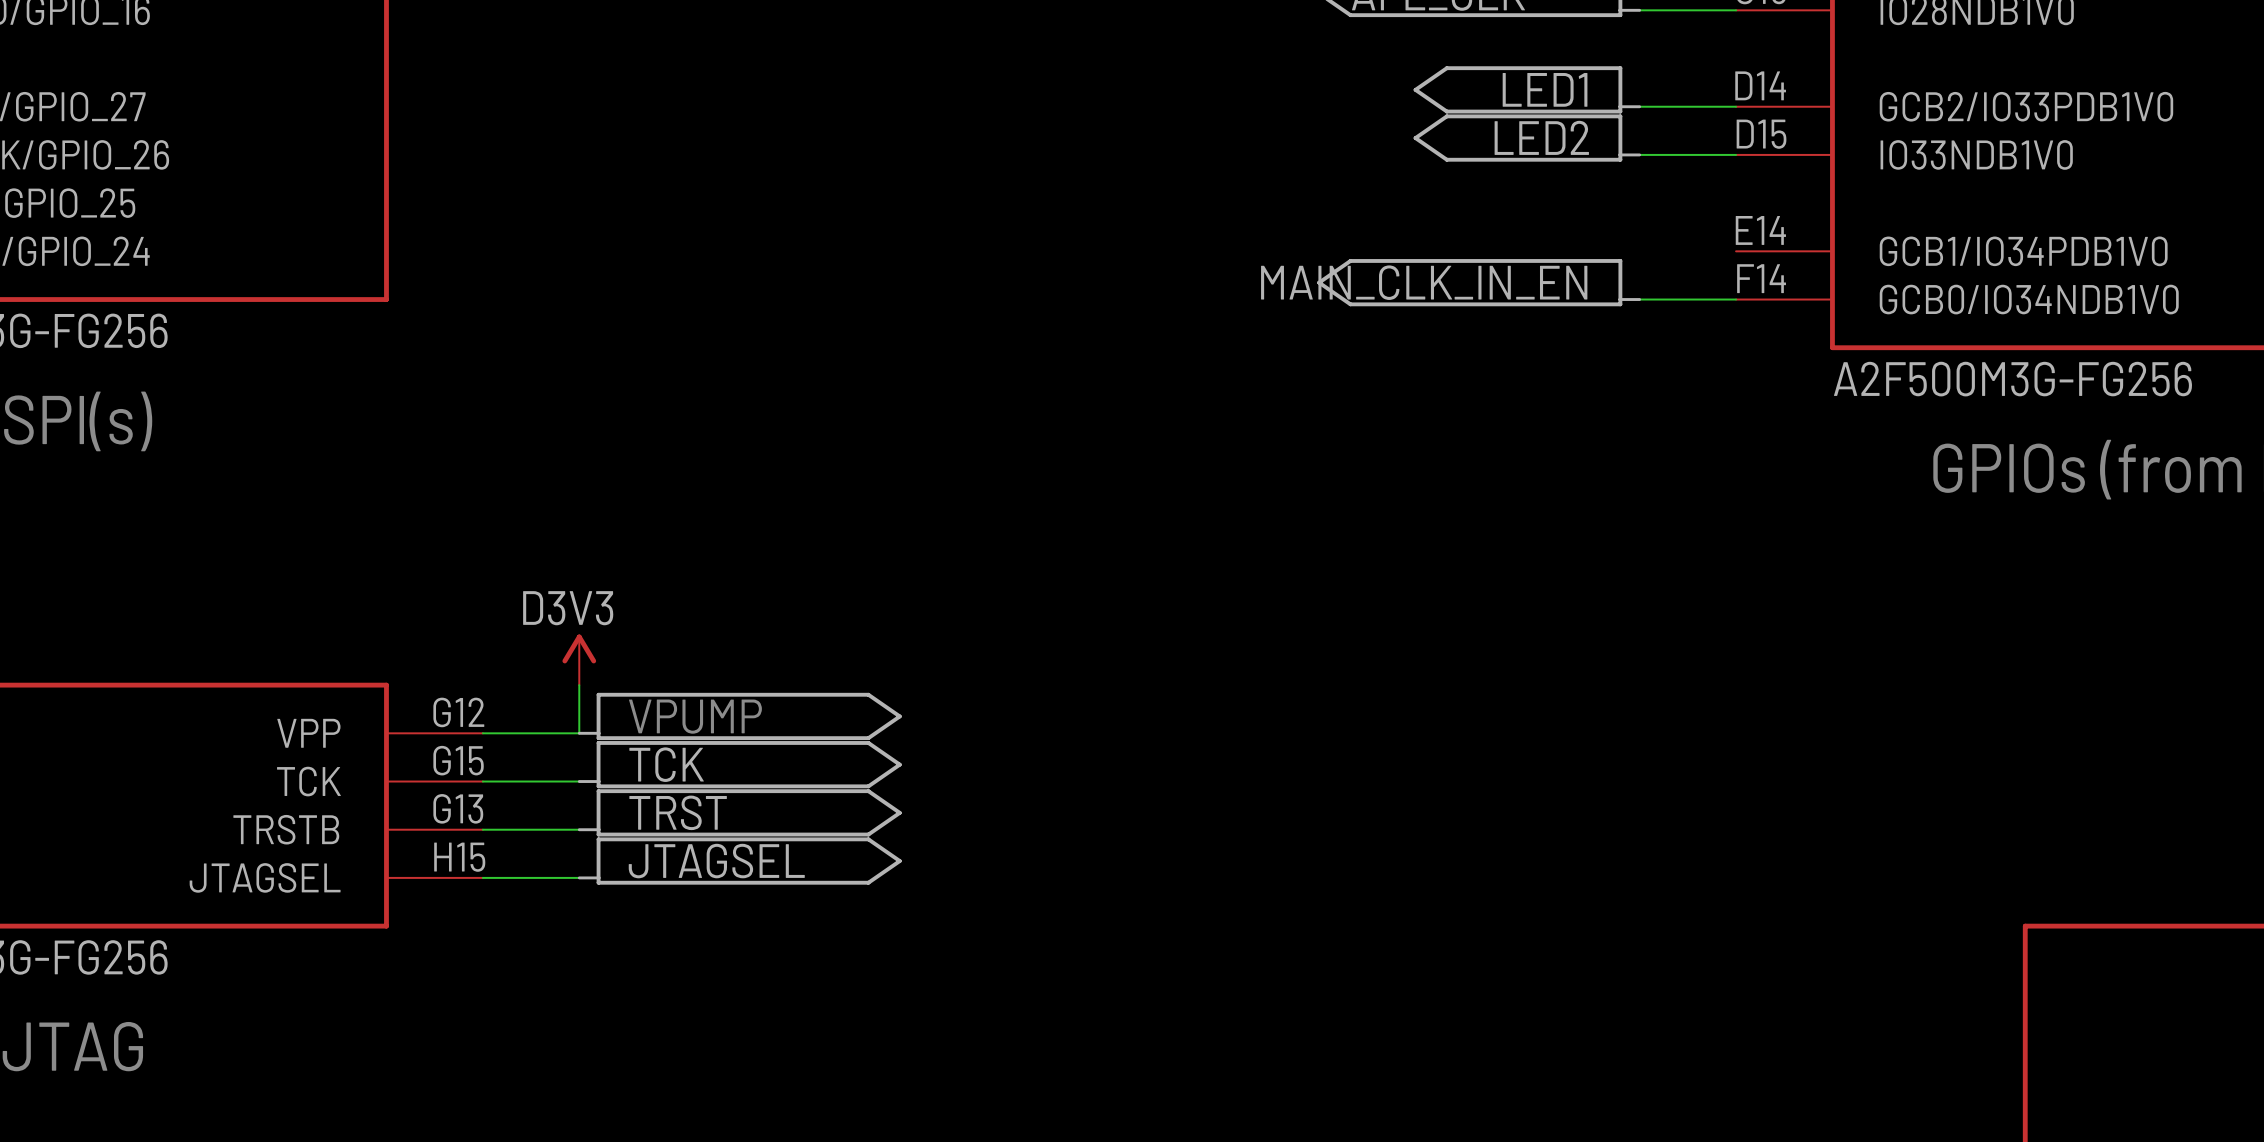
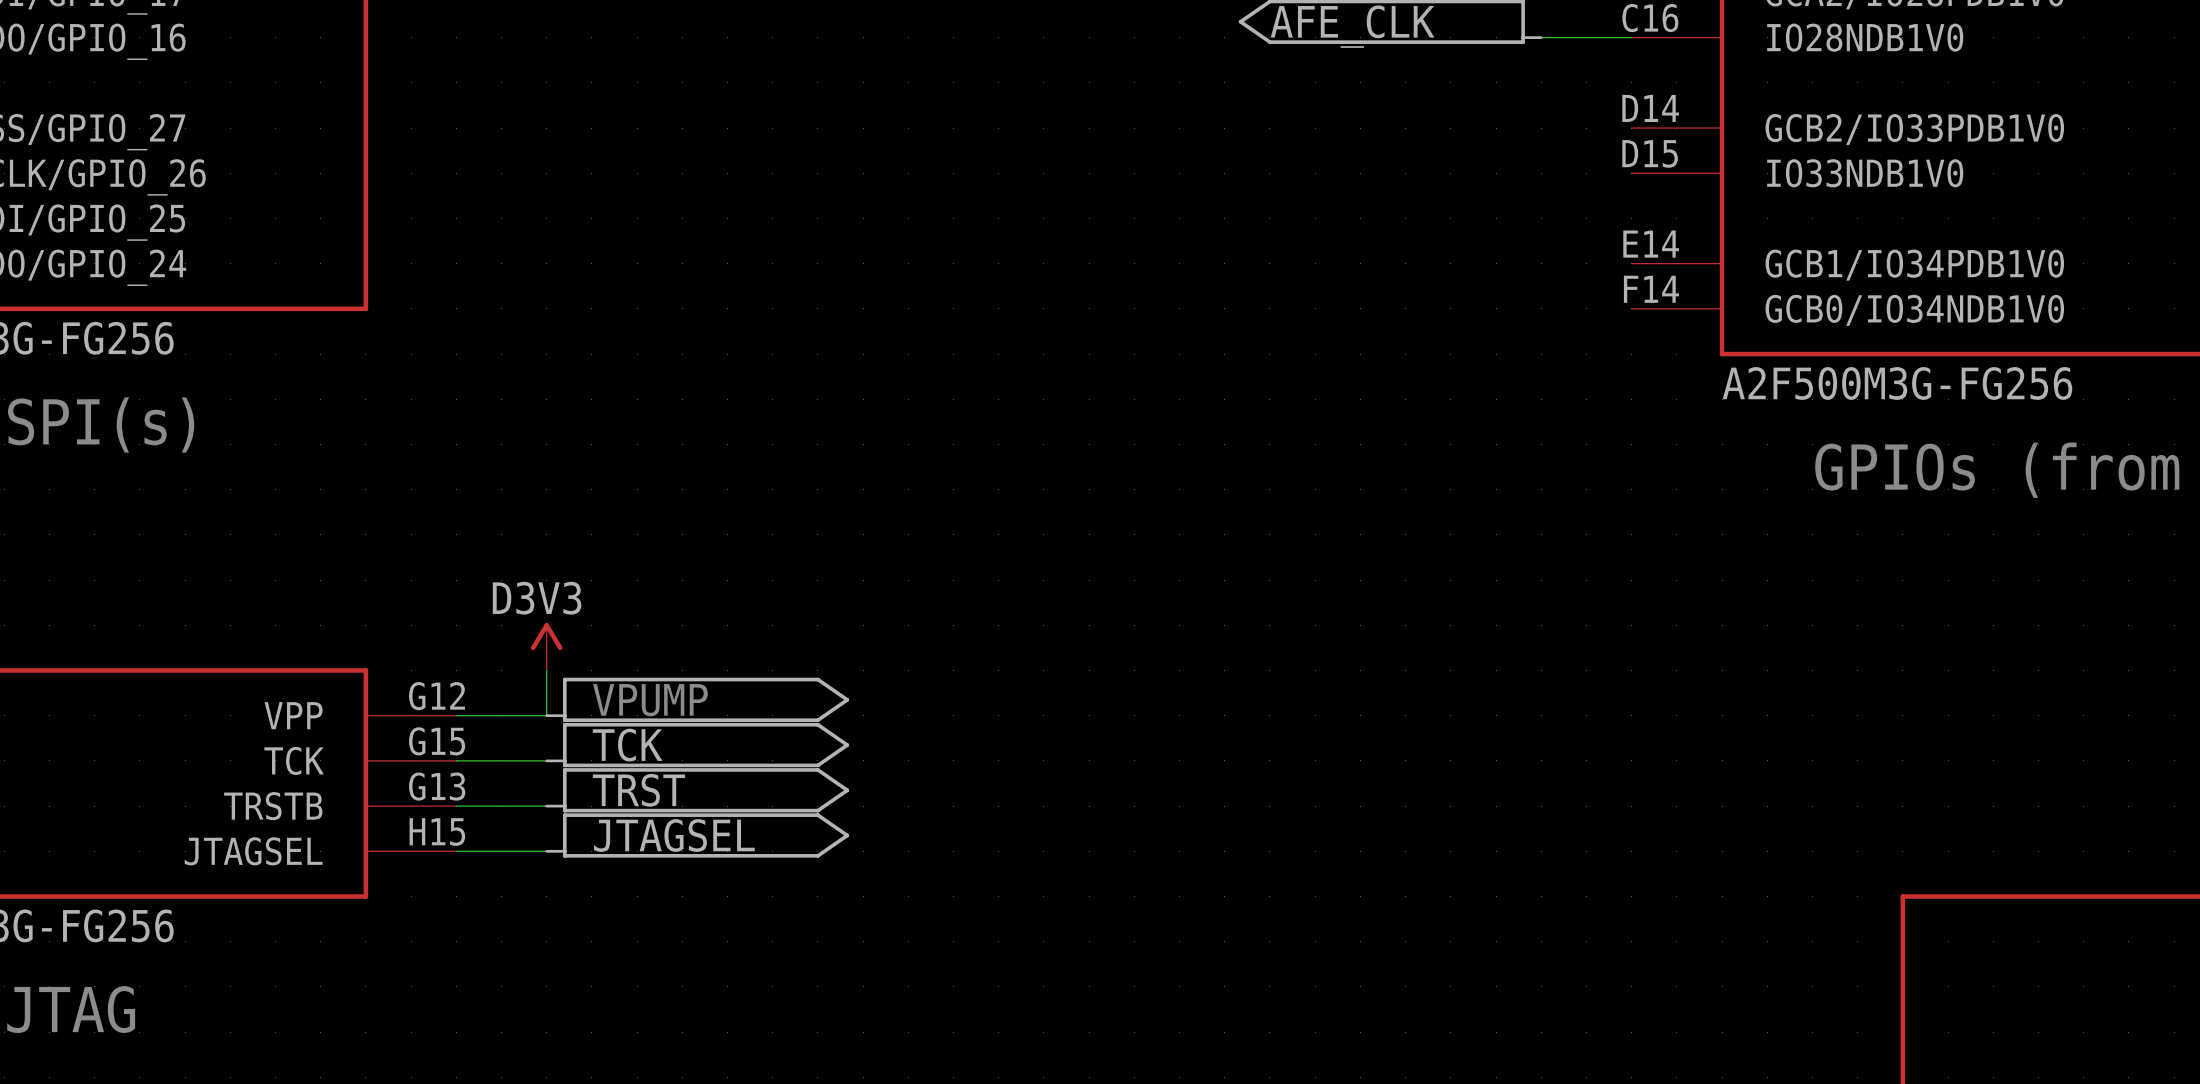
part: (1527, 89) -> none
label: LED1 (1545, 89) -> none
wire: (1639, 106) (1736, 106) -> none
label: LED2 (1541, 137) -> none
part: (1527, 138) -> none
wire: (1639, 154) (1736, 154) -> none
label: MAIN_CLK_IN_EN (1424, 282) -> none
part: (1479, 282) -> none
wire: (1639, 299) (1736, 299) -> none

